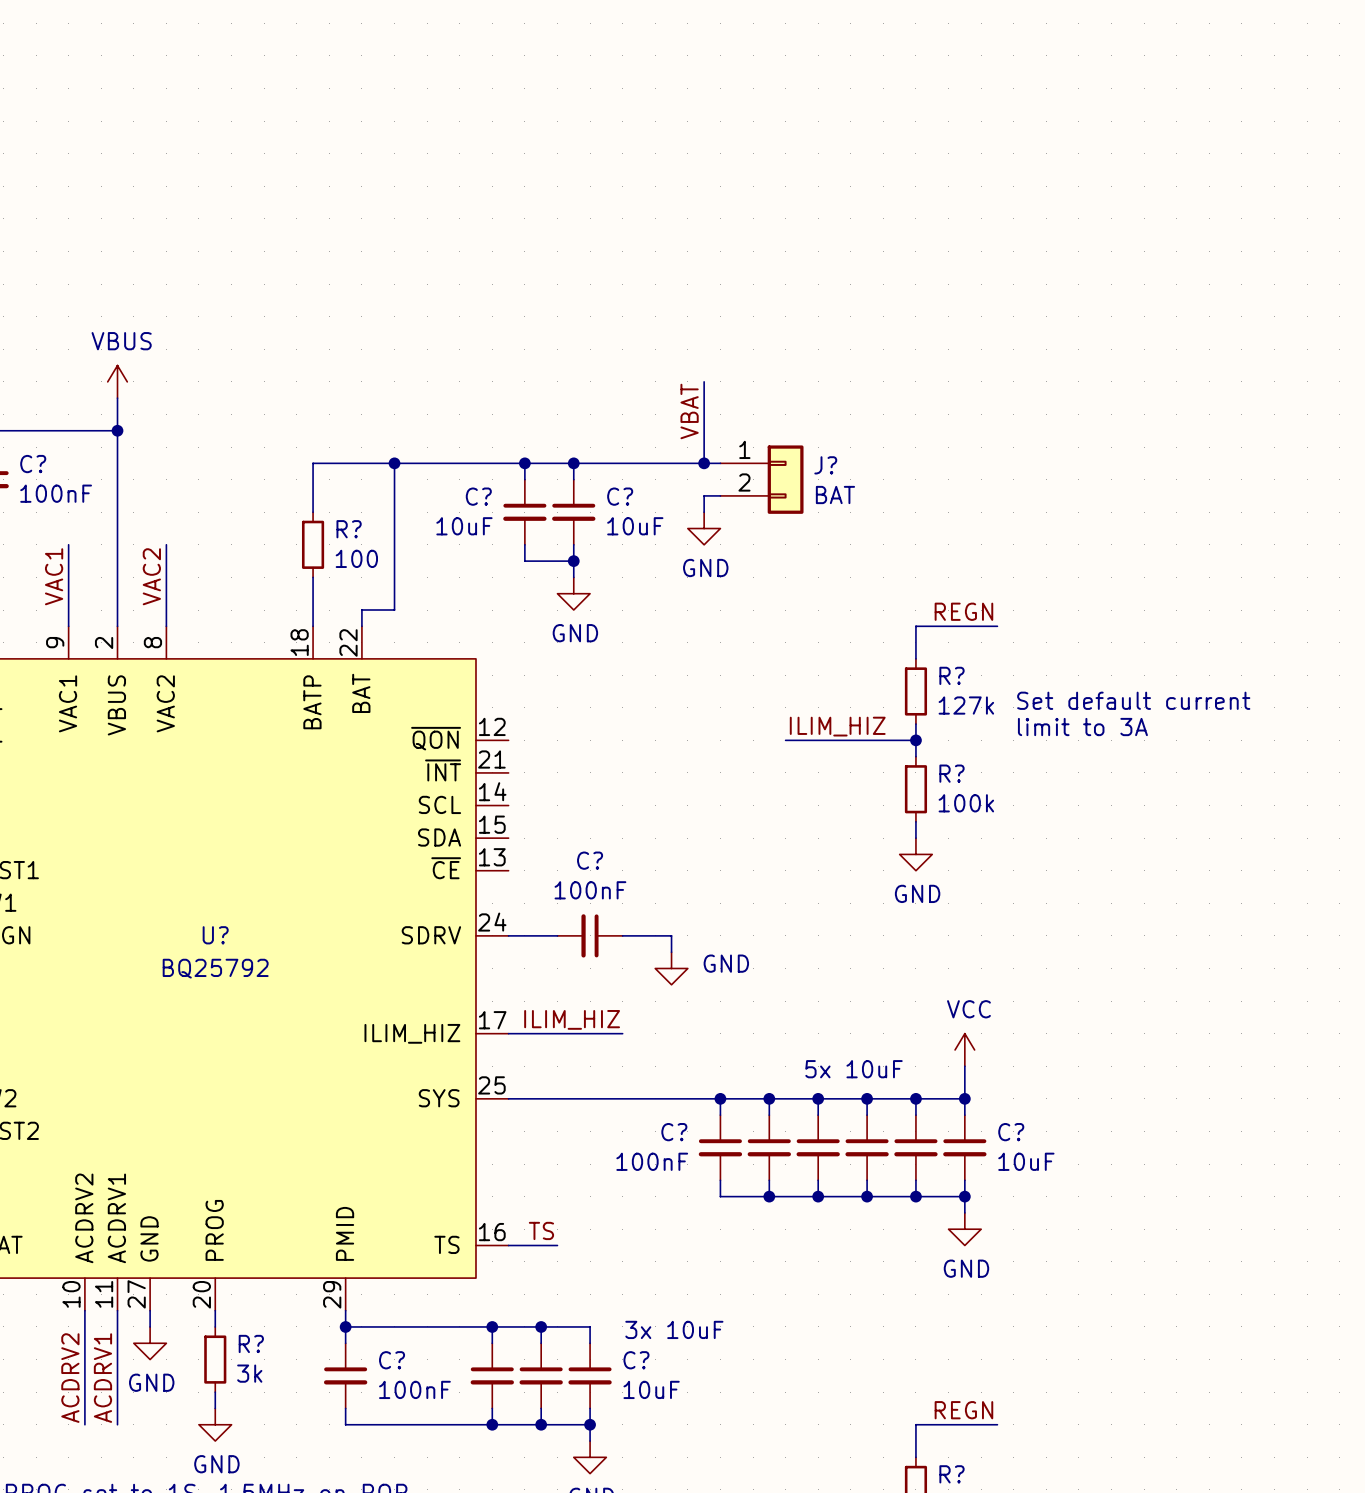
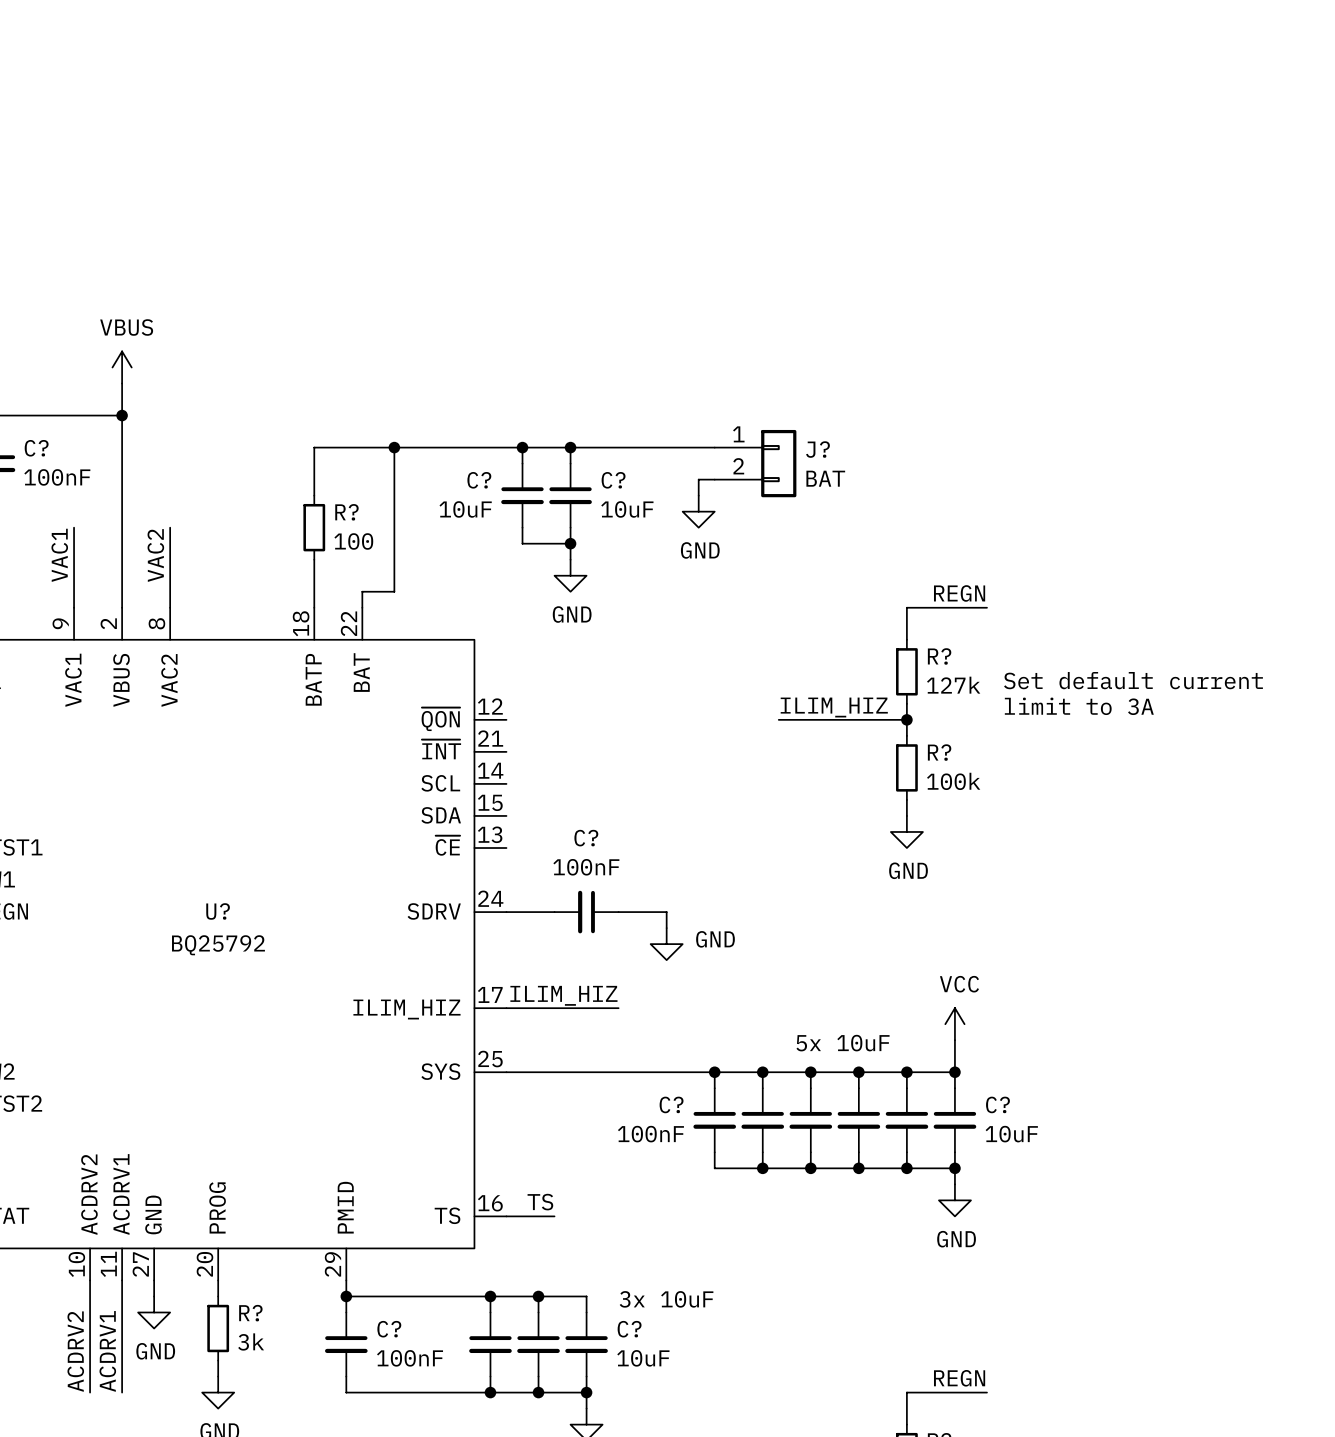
wire: (704, 381) (704, 463) -> none
label: VBAT (689, 411) -> none
junction: (704, 463) -> none

